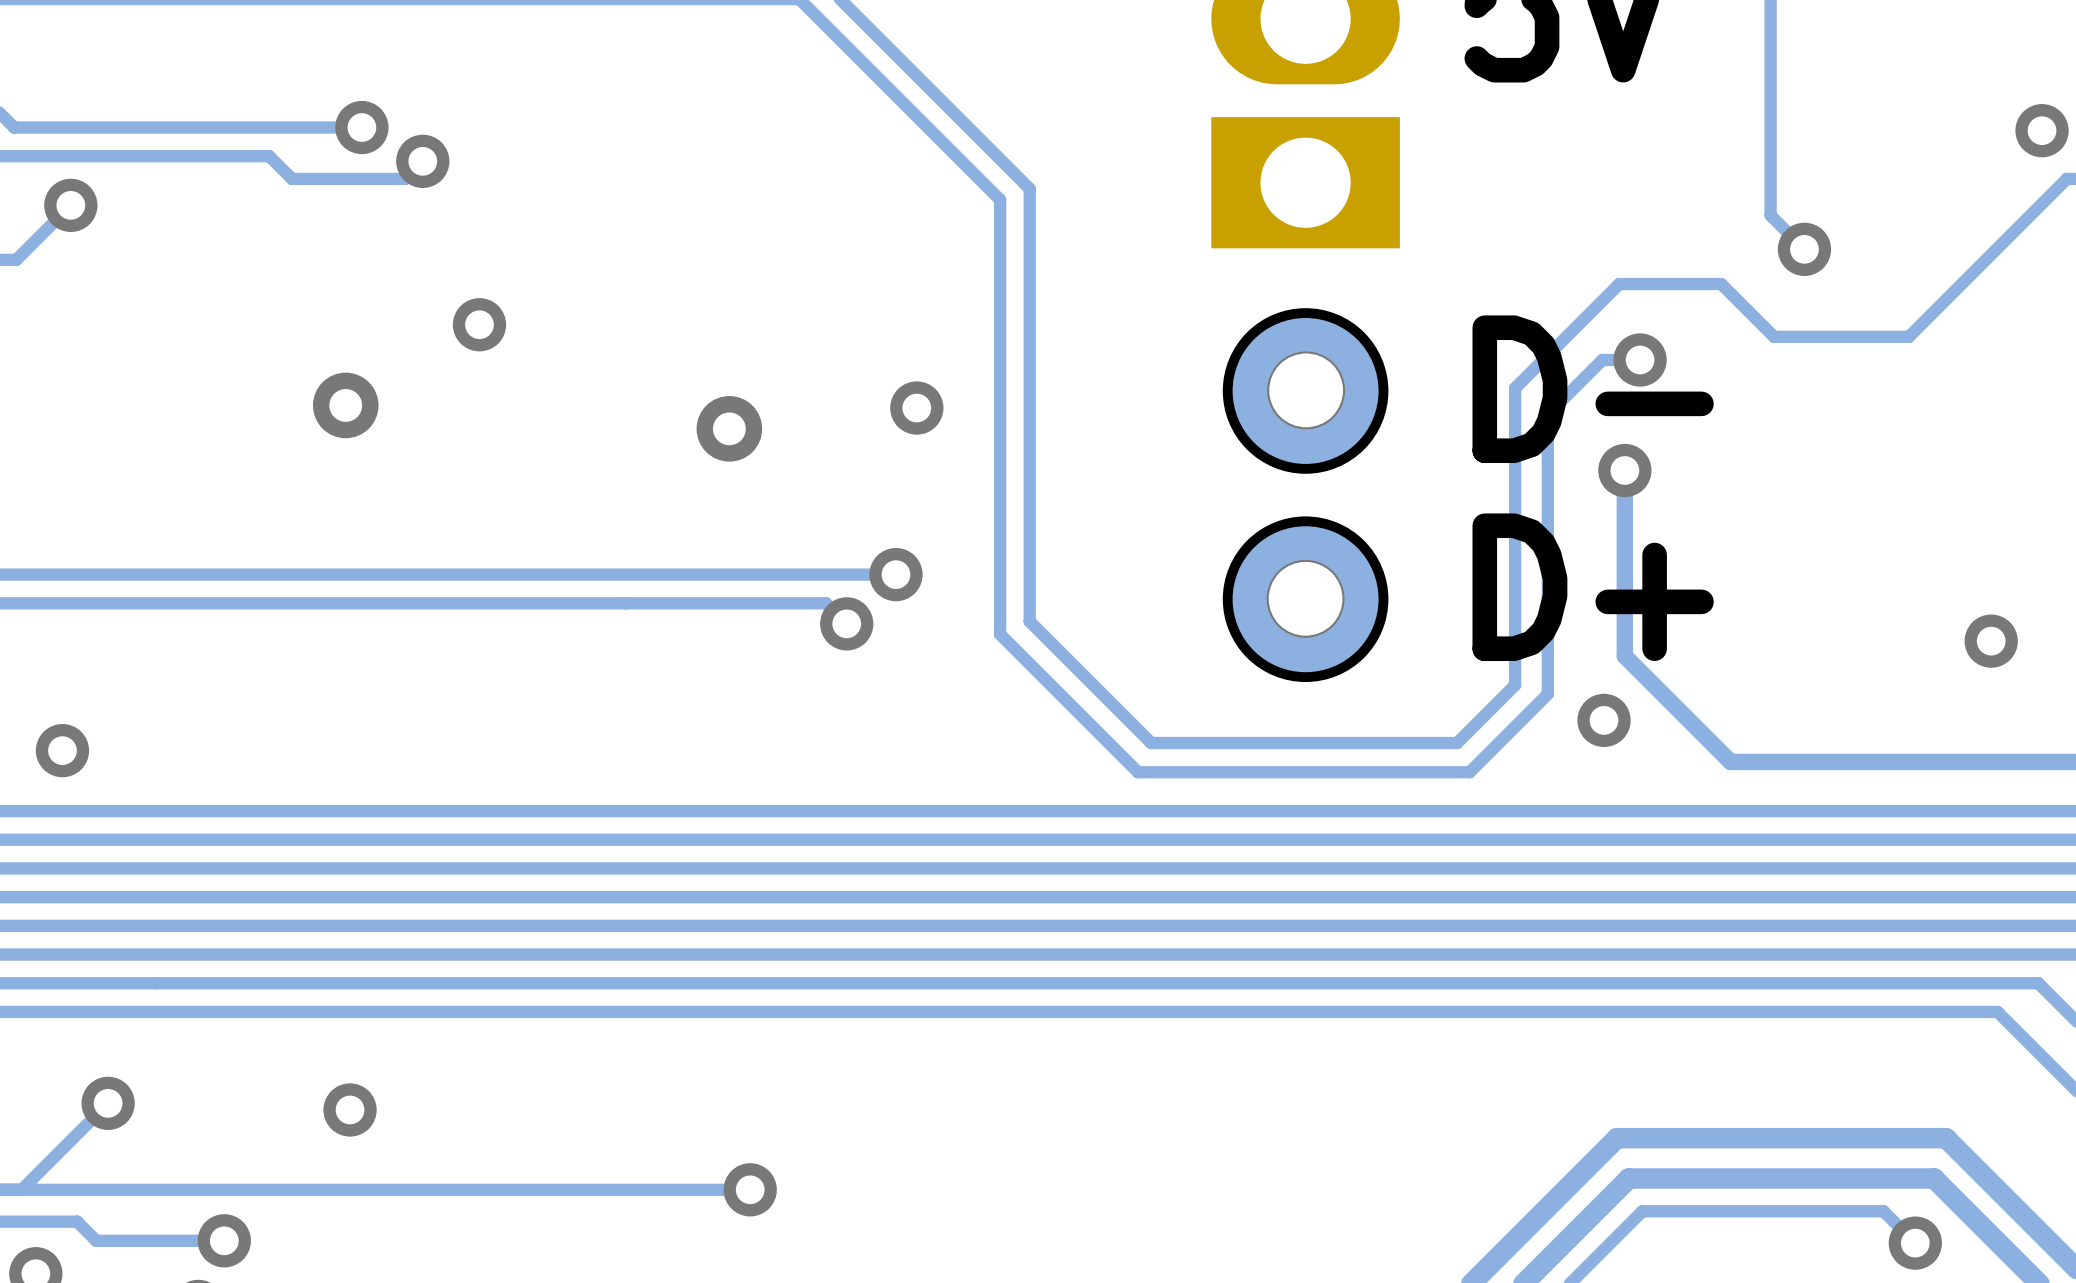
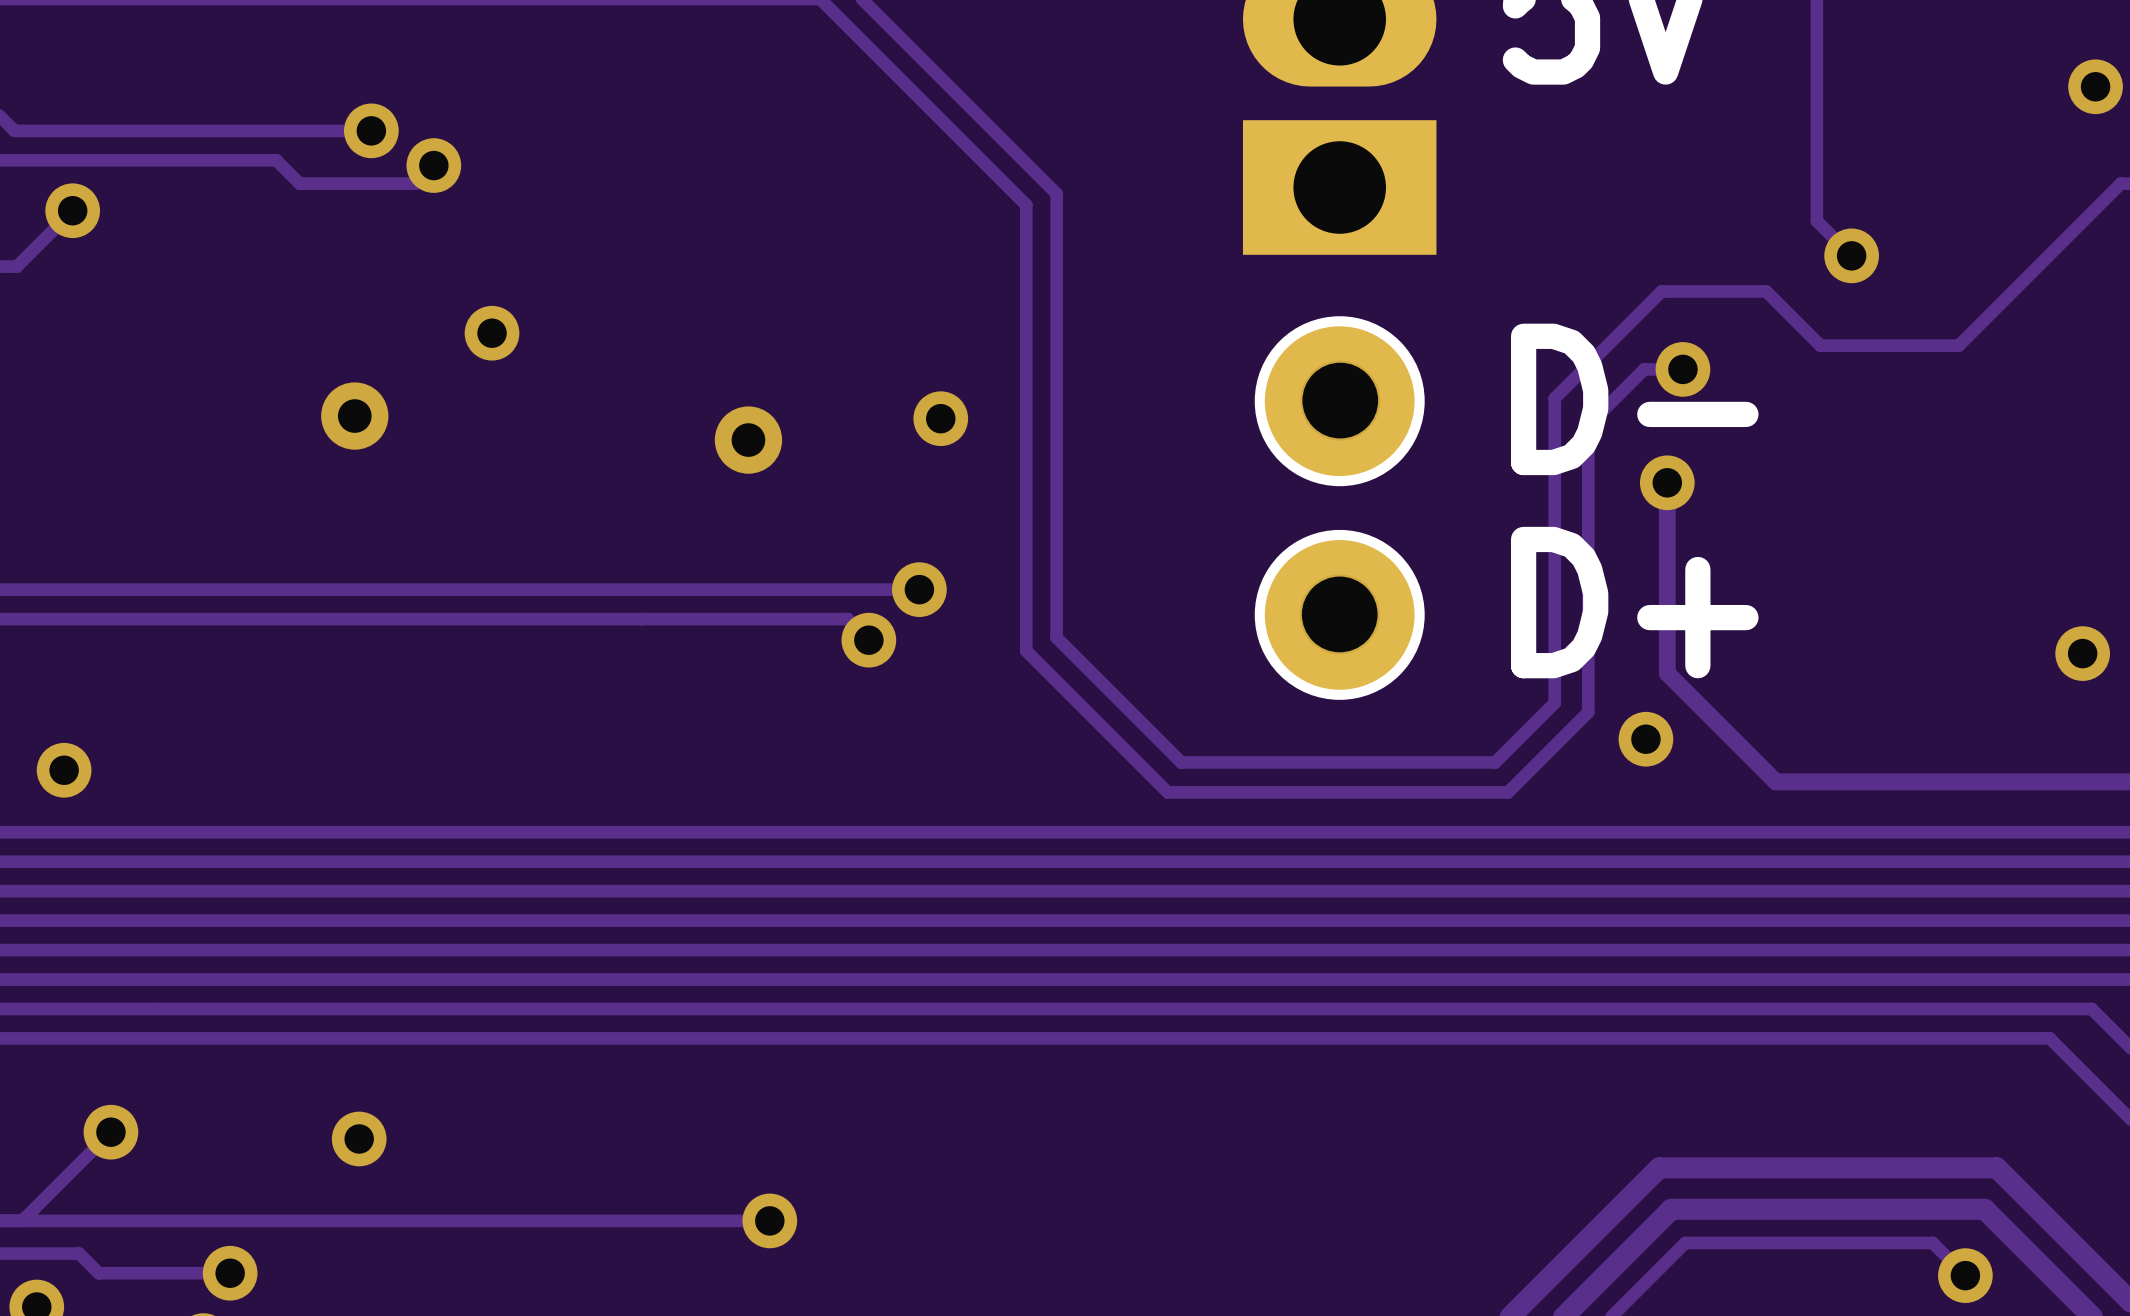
via position: (2042, 130) -> (2095, 86)
via position: (1991, 641) -> (2082, 653)

